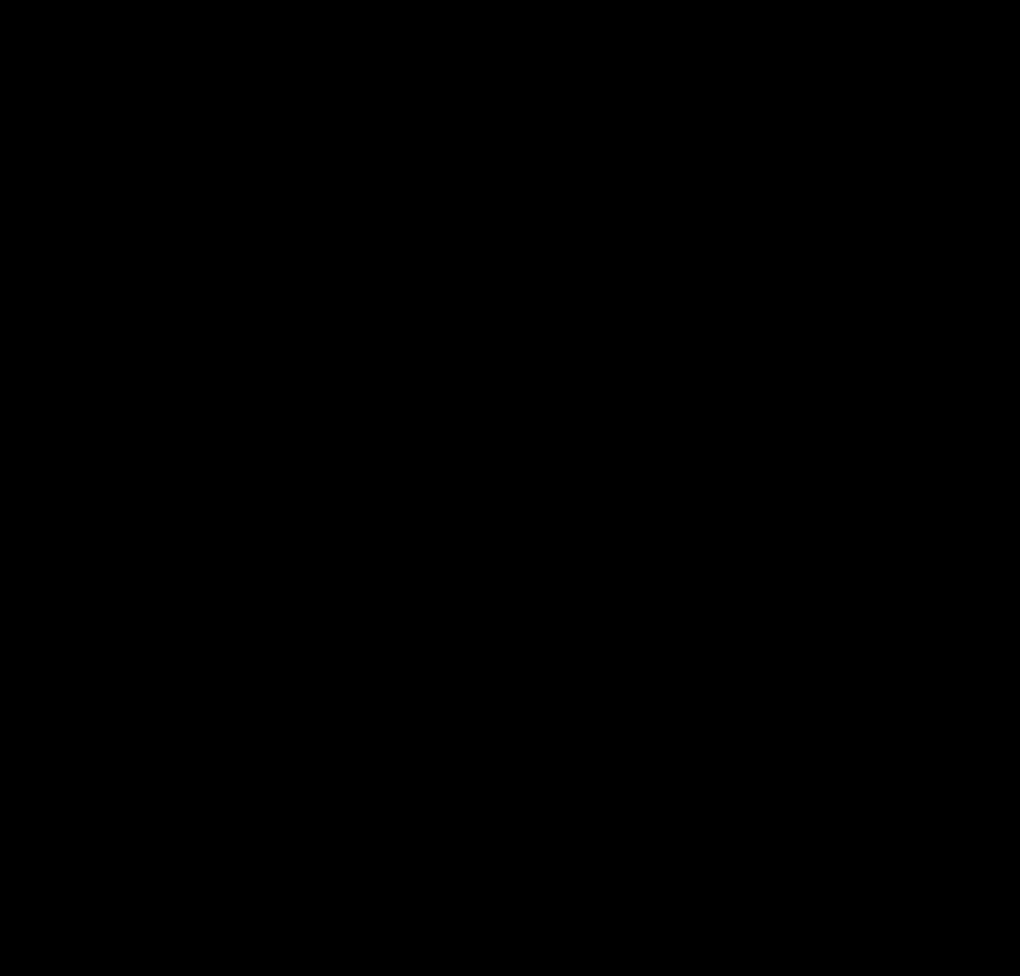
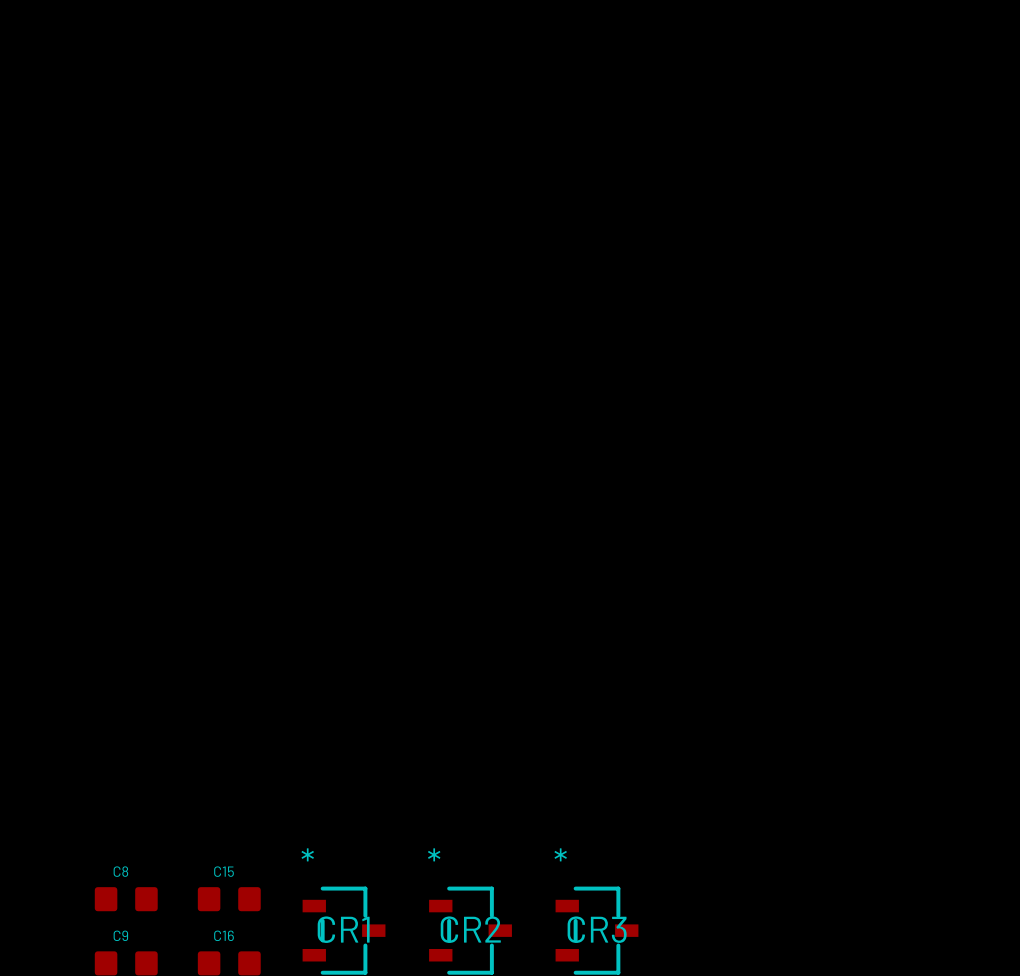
C8: none -> (126, 899)
C15: none -> (229, 899)
CR1: none -> (344, 930)
CR2: none -> (470, 930)
CR3: none -> (597, 930)
C9: none -> (126, 963)
C16: none -> (229, 963)

